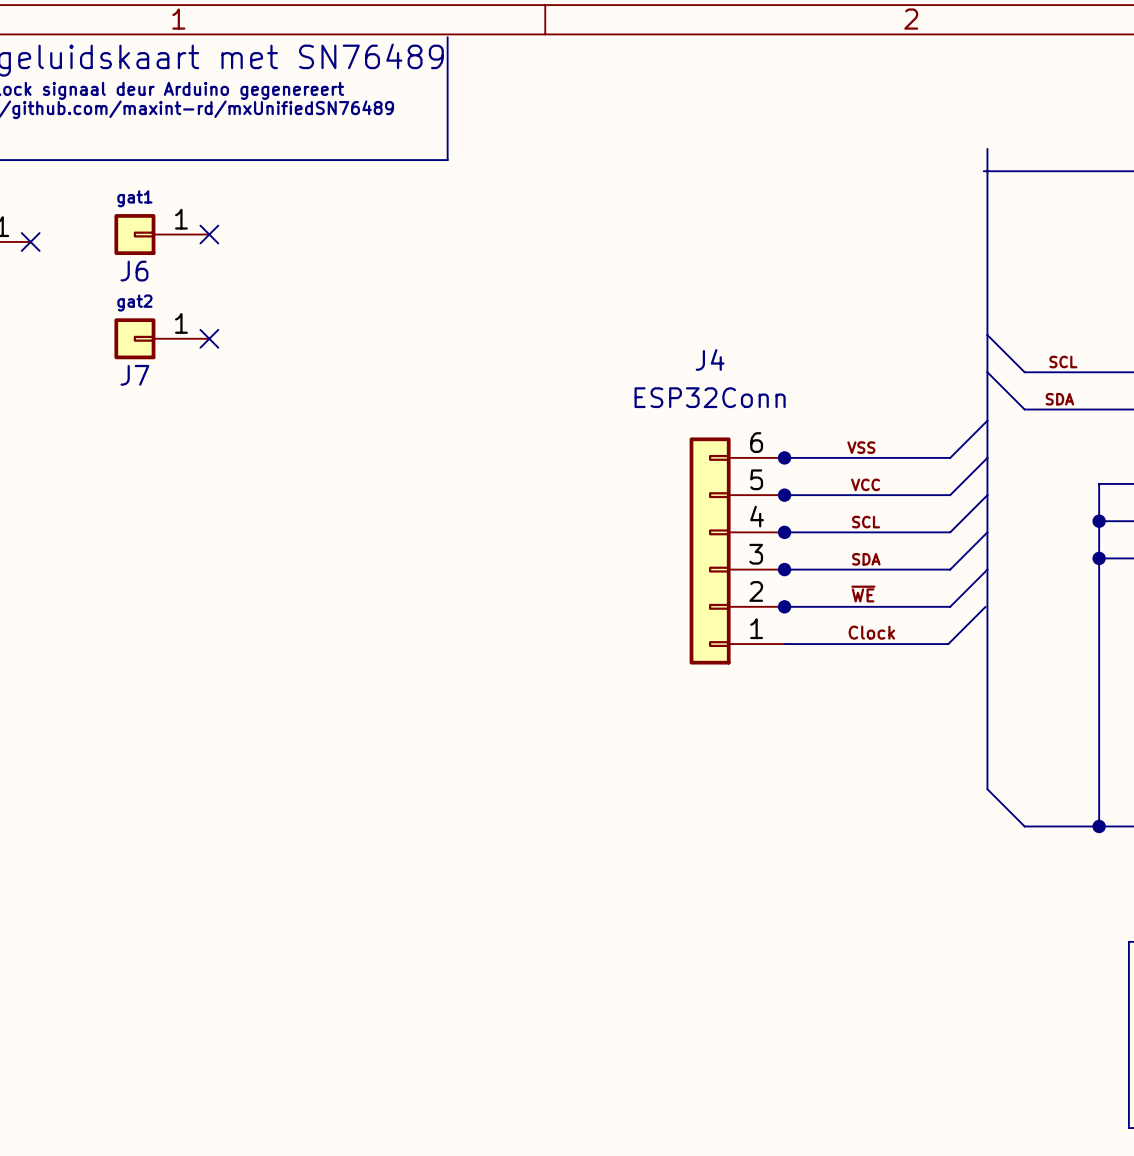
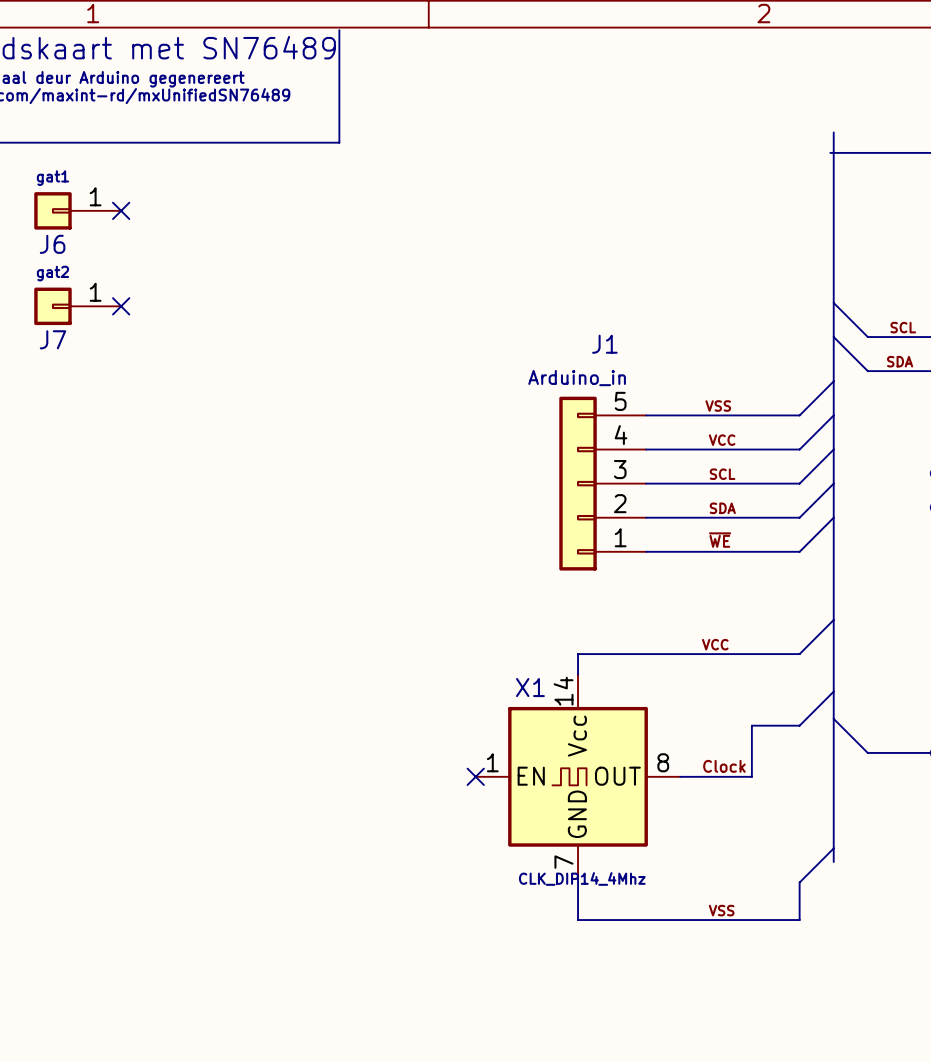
junction: (784, 457) -> none
junction: (784, 495) -> none
J1: none -> Arduino_in (602, 483)
junction: (784, 532) -> none
J4: ESP32Conn (737, 550) -> none
junction: (784, 569) -> none
junction: (784, 606) -> none
wire: (985, 606) (948, 644) (784, 644) -> none
label position: Clock (871, 632) -> Clock (724, 766)
wire: none -> (833, 619) (799, 654) (578, 654) (578, 674)
label: none -> VCC (715, 644)
wire: none -> (833, 691) (799, 725) (751, 725) (751, 776) (680, 776)
bus: none -> (833, 718) (833, 862)
no-connect mark: none -> (475, 776)
X1: none -> CLK_DIP14_4Mhz (578, 776)
wire: none -> (833, 848) (799, 882) (799, 920) (578, 920) (578, 879)
label: none -> VSS (721, 910)

